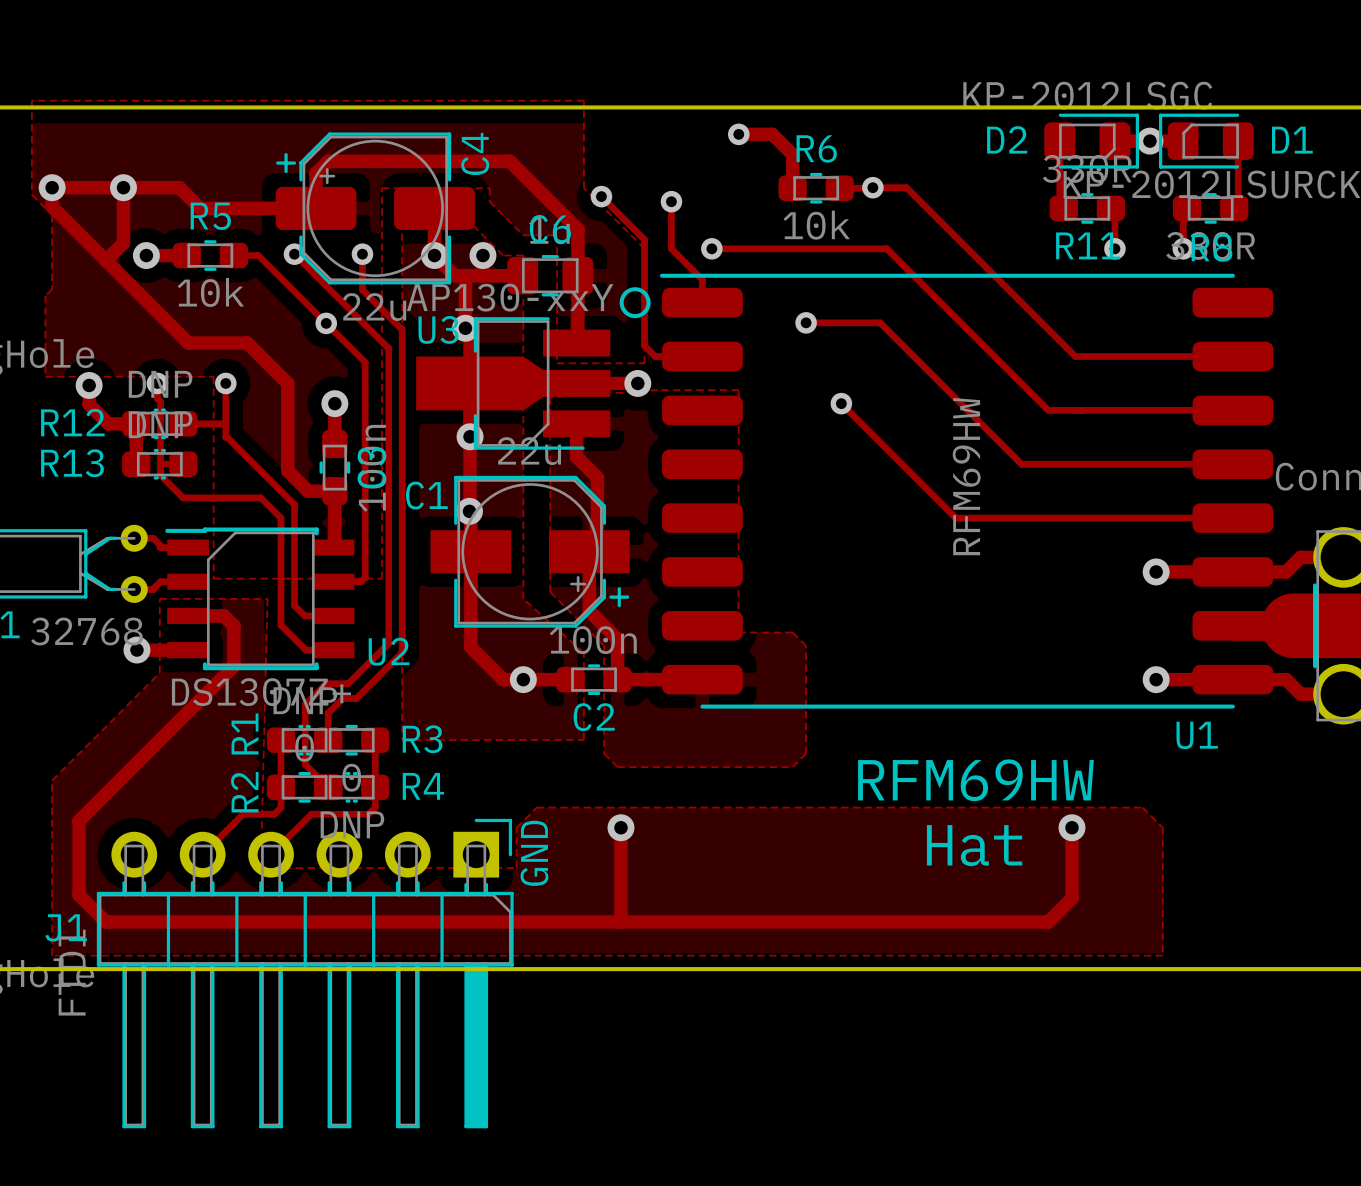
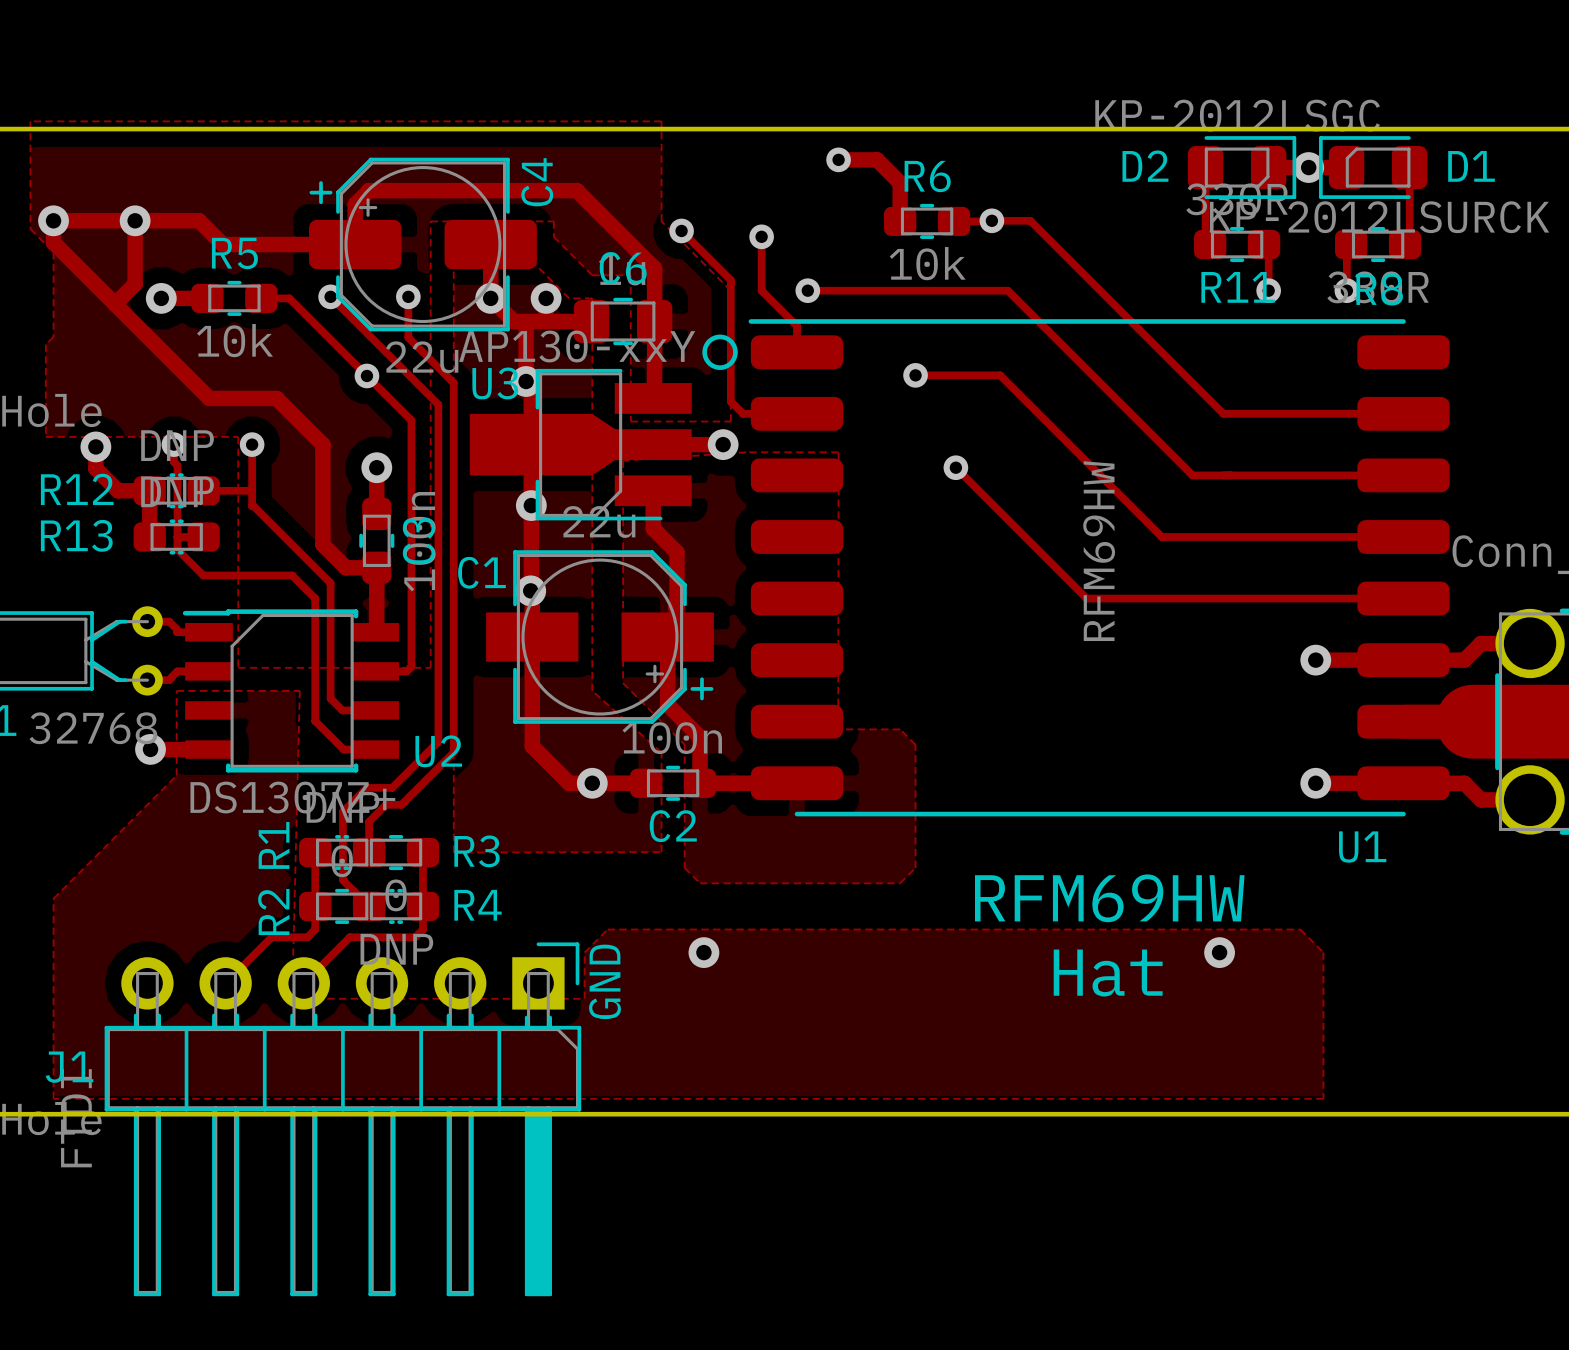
track: (188, 615) (224, 615) (233, 625) (233, 666) (79, 821) (79, 895) (105, 921) (1048, 921) (1072, 898) (1072, 827) -> none
track: (621, 827) (621, 921) -> none

